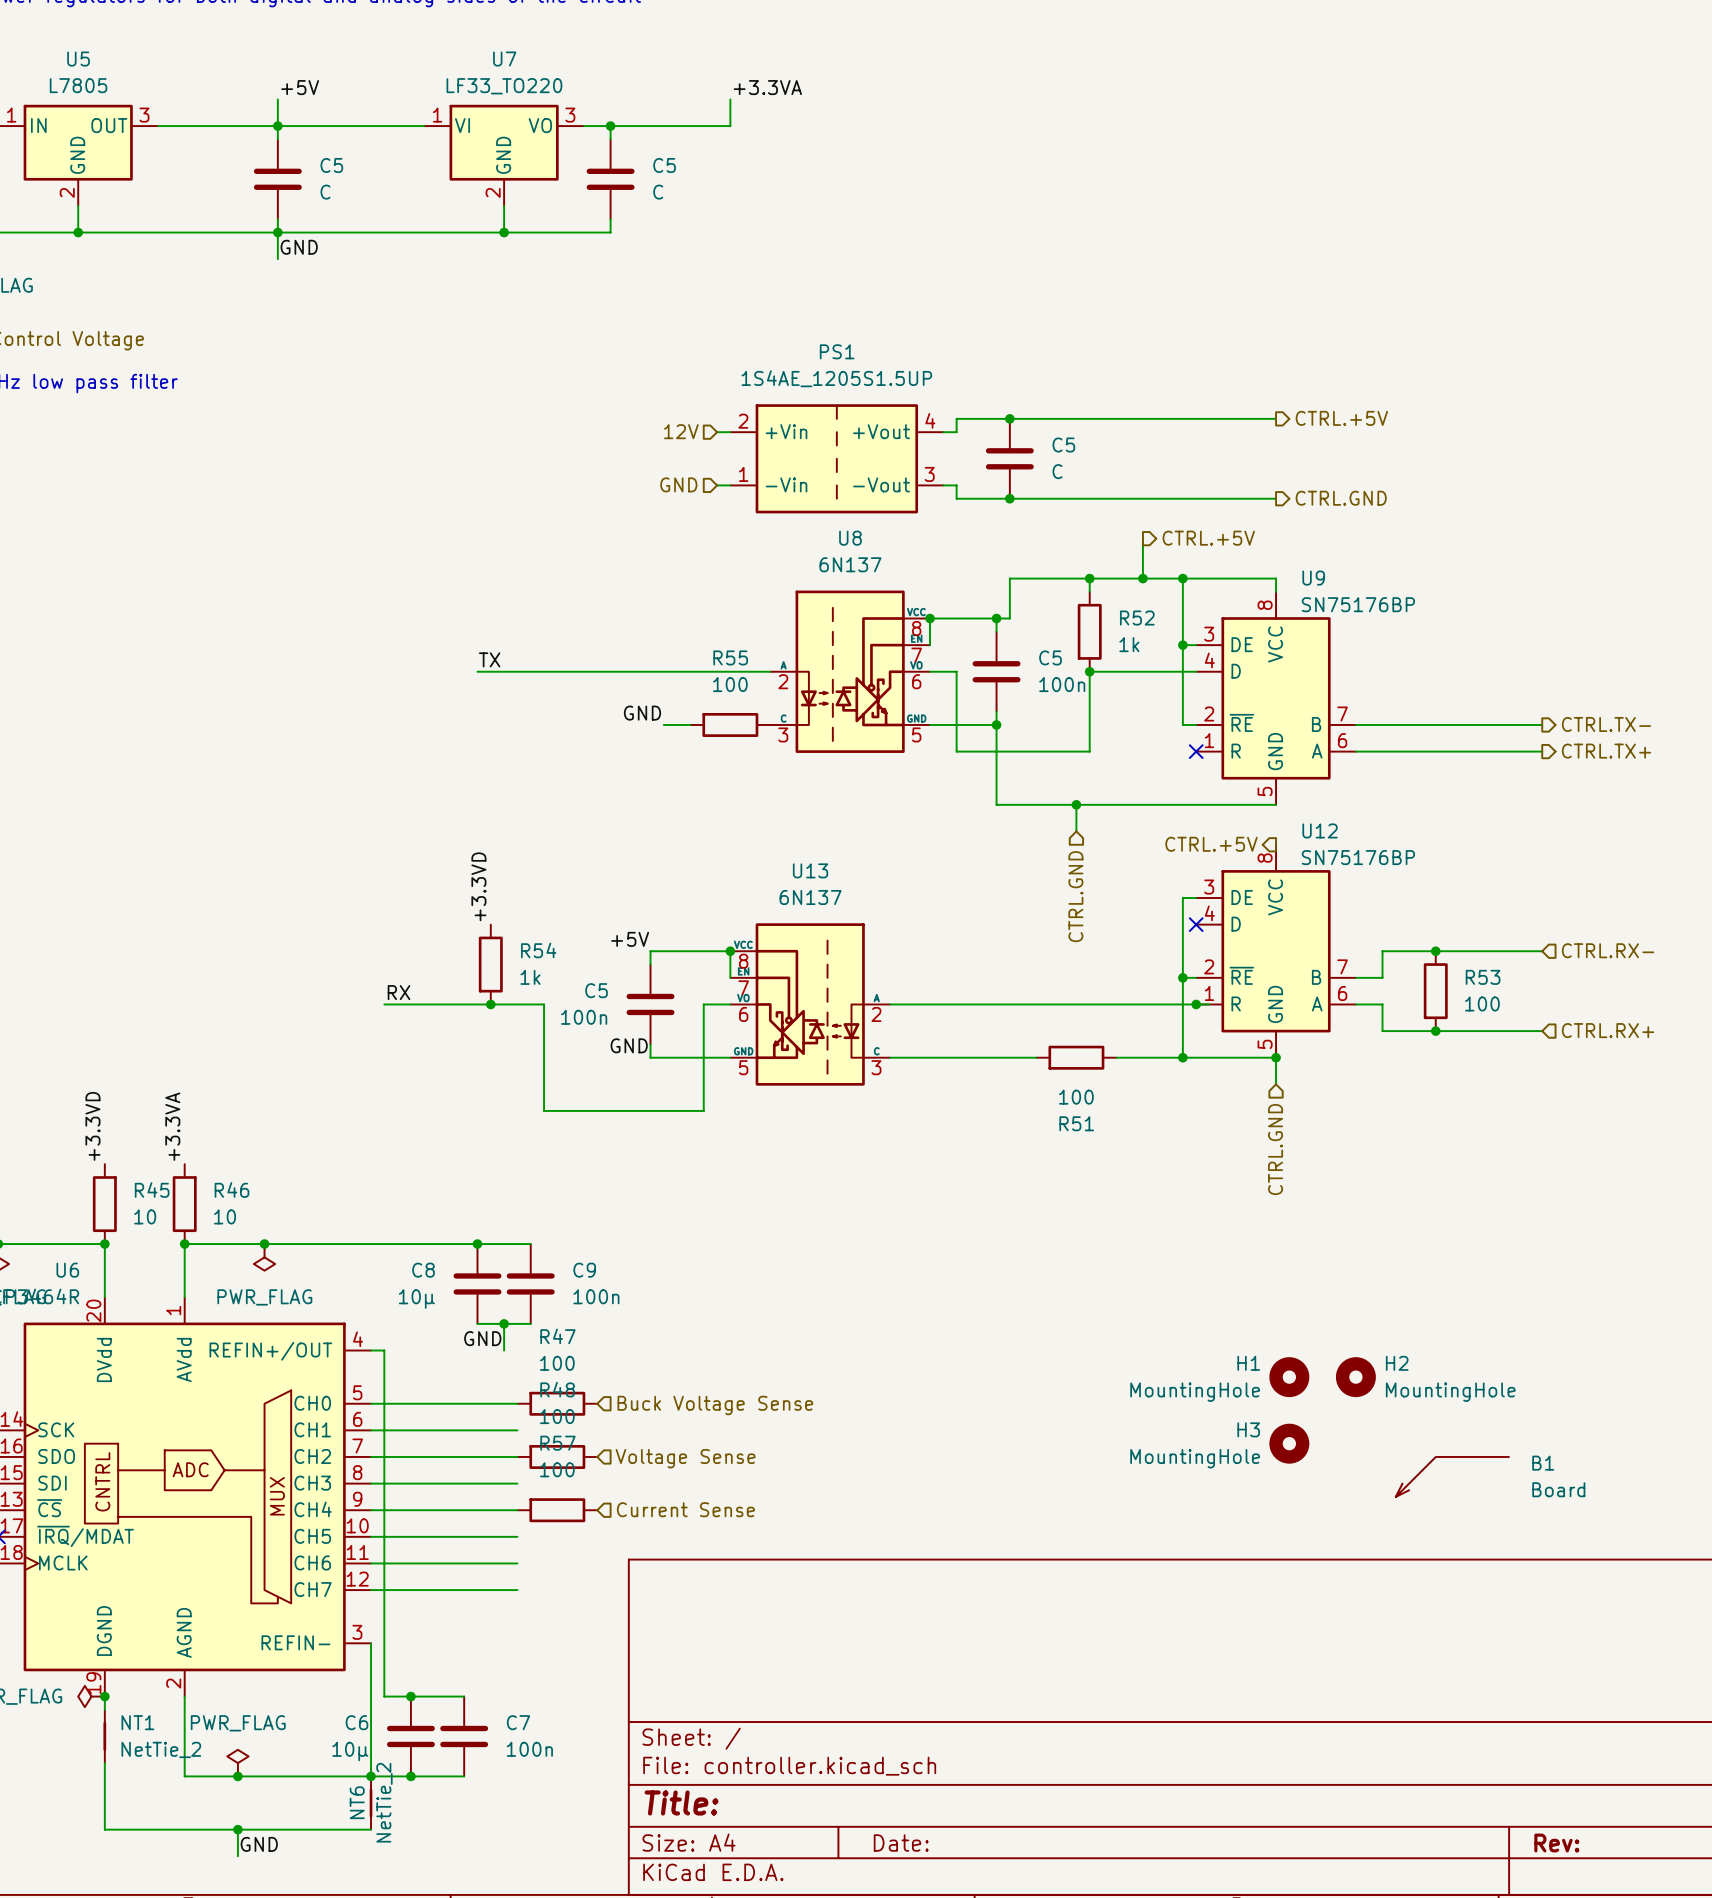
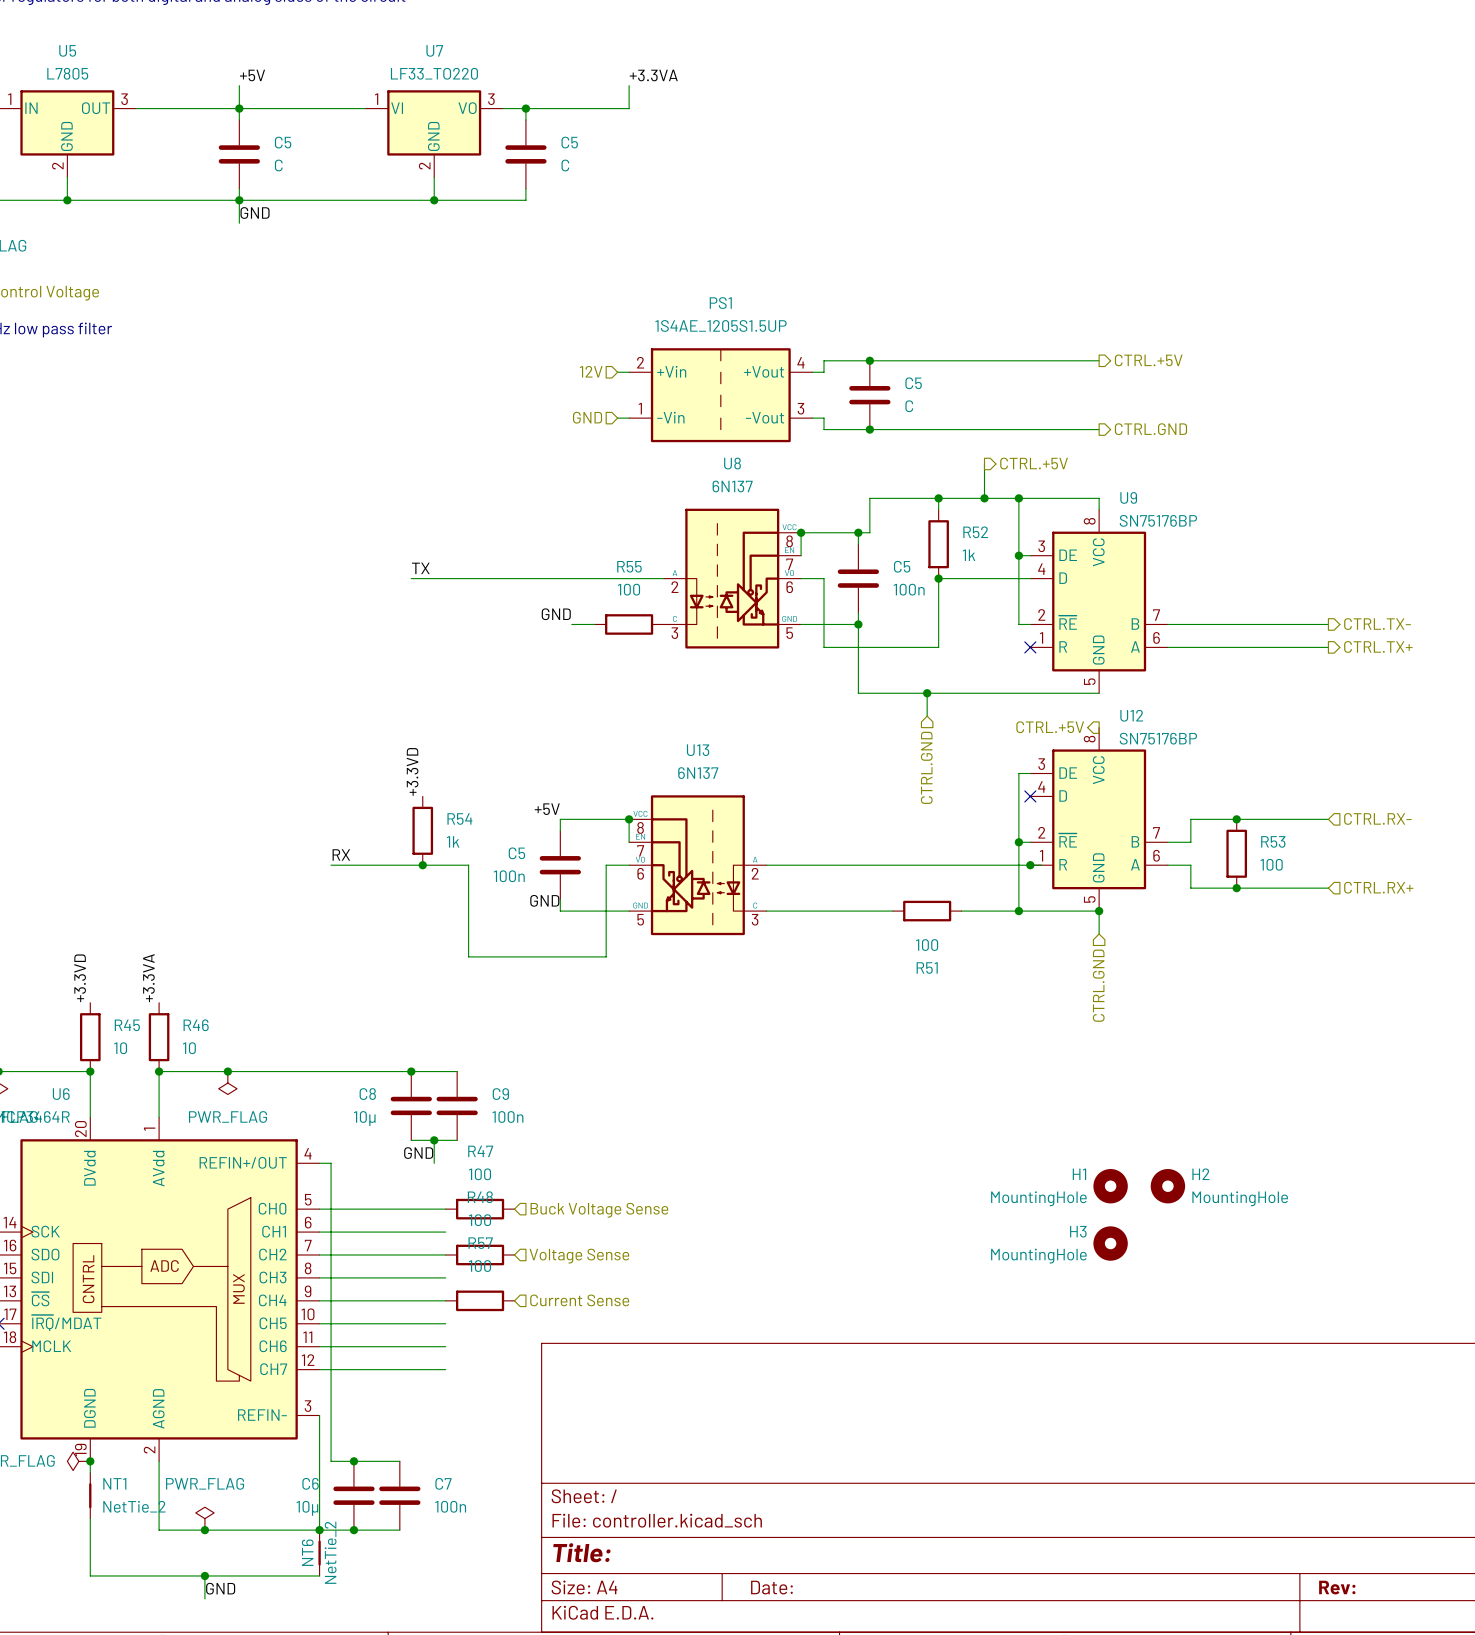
B1: Board (1452, 1476) -> none

